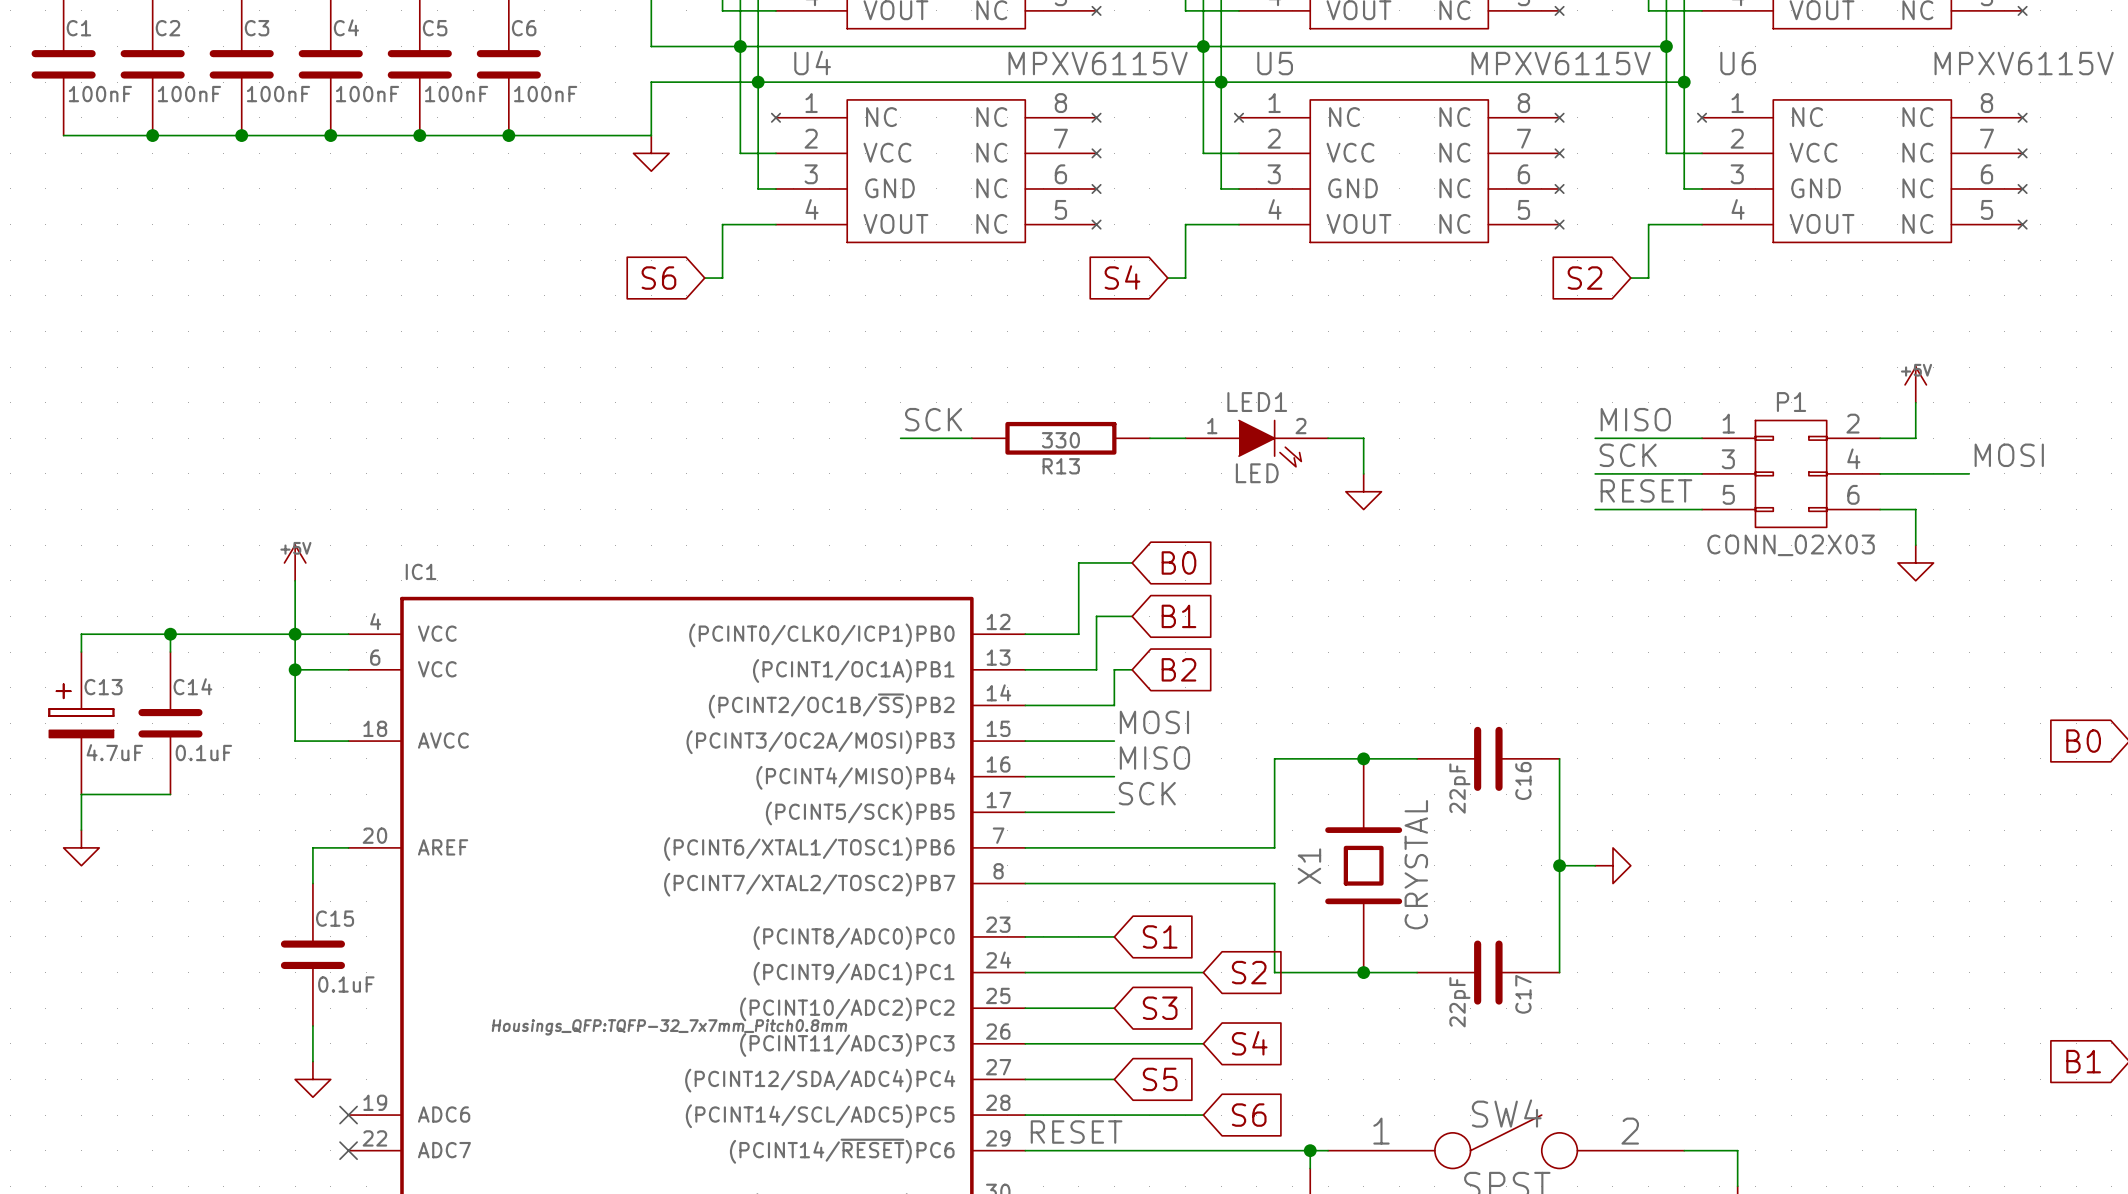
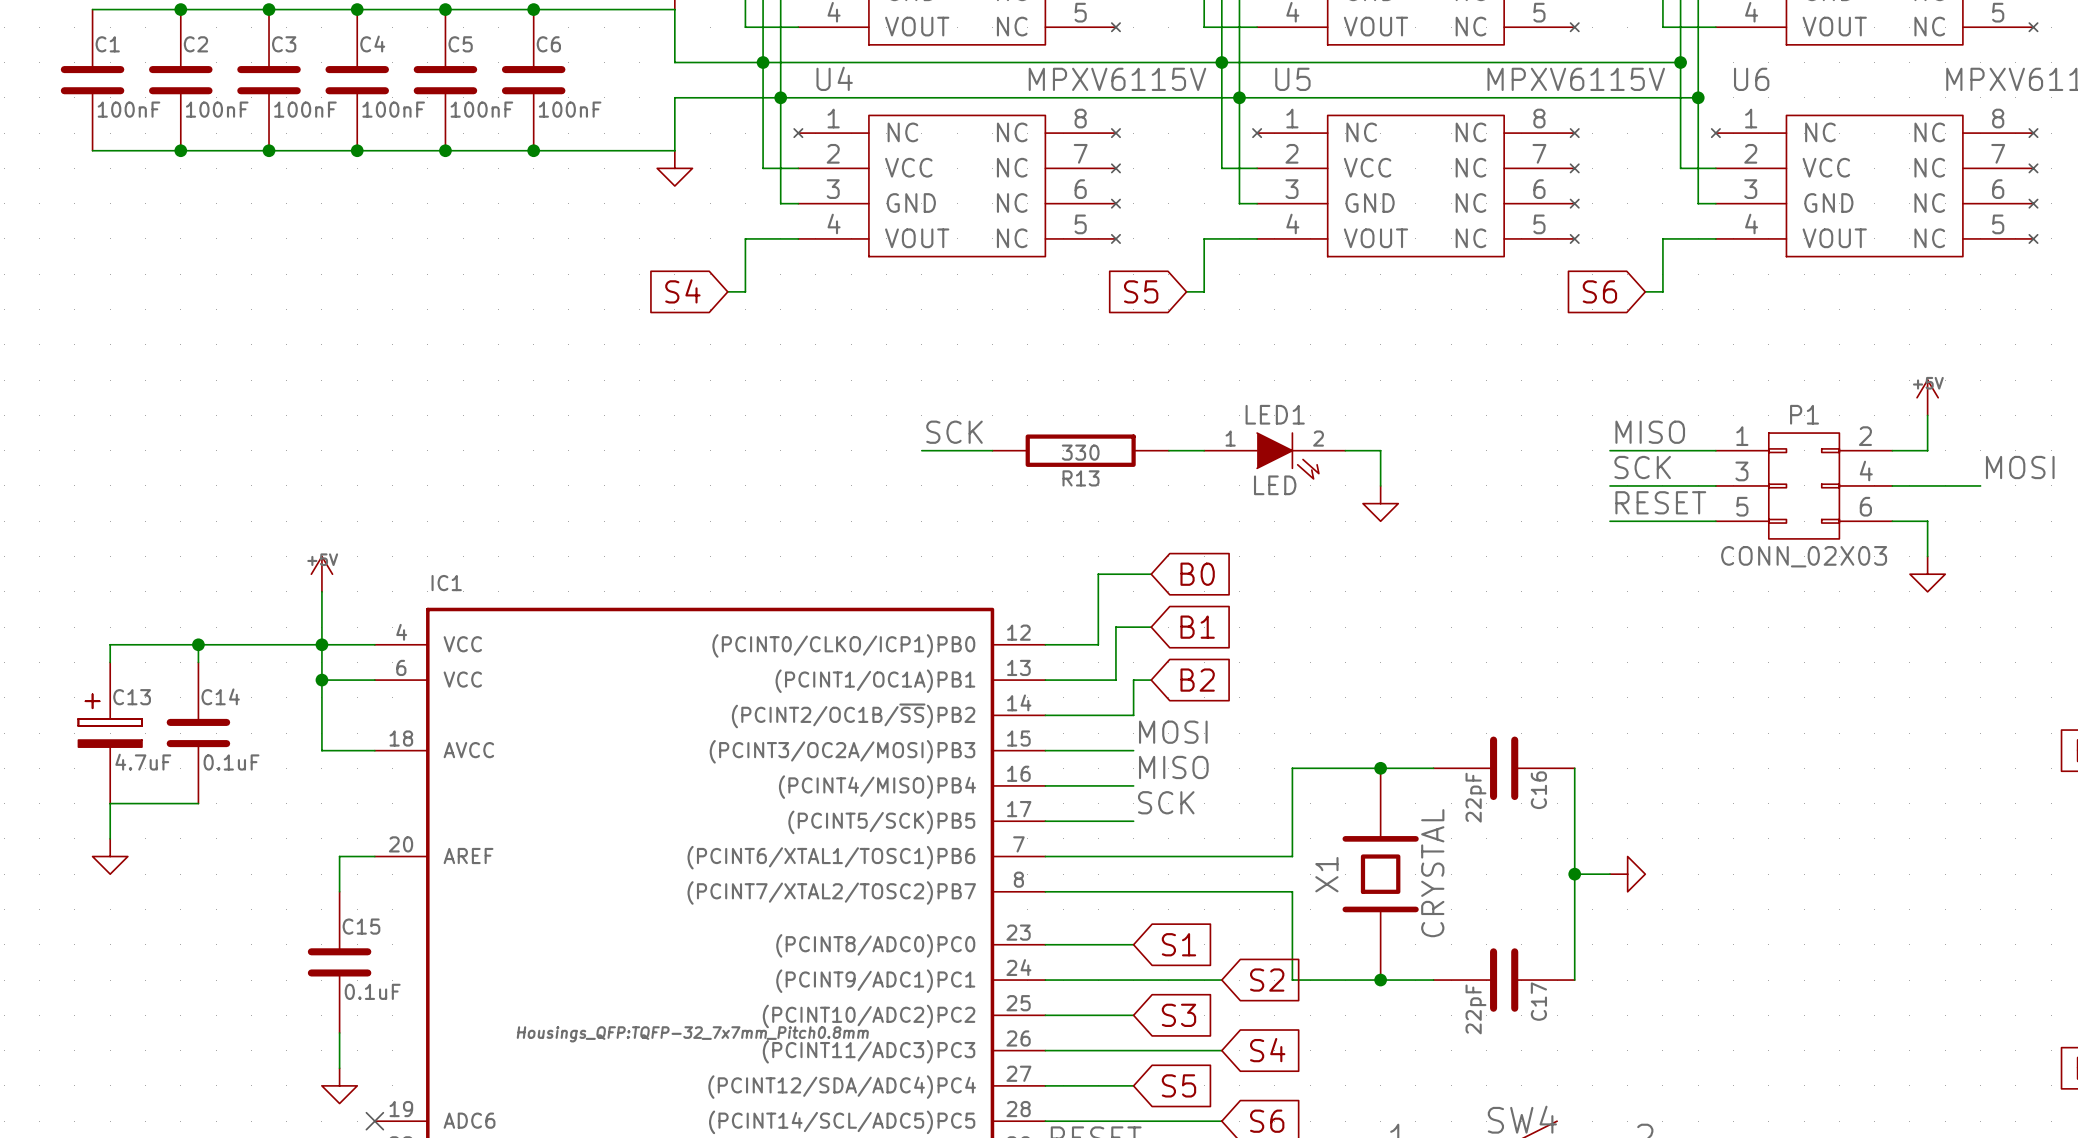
global label: S4 (1122, 277) -> S5 (1141, 291)
global label: S6 (658, 278) -> S4 (682, 291)
global label: S2 (1585, 278) -> S6 (1599, 291)

